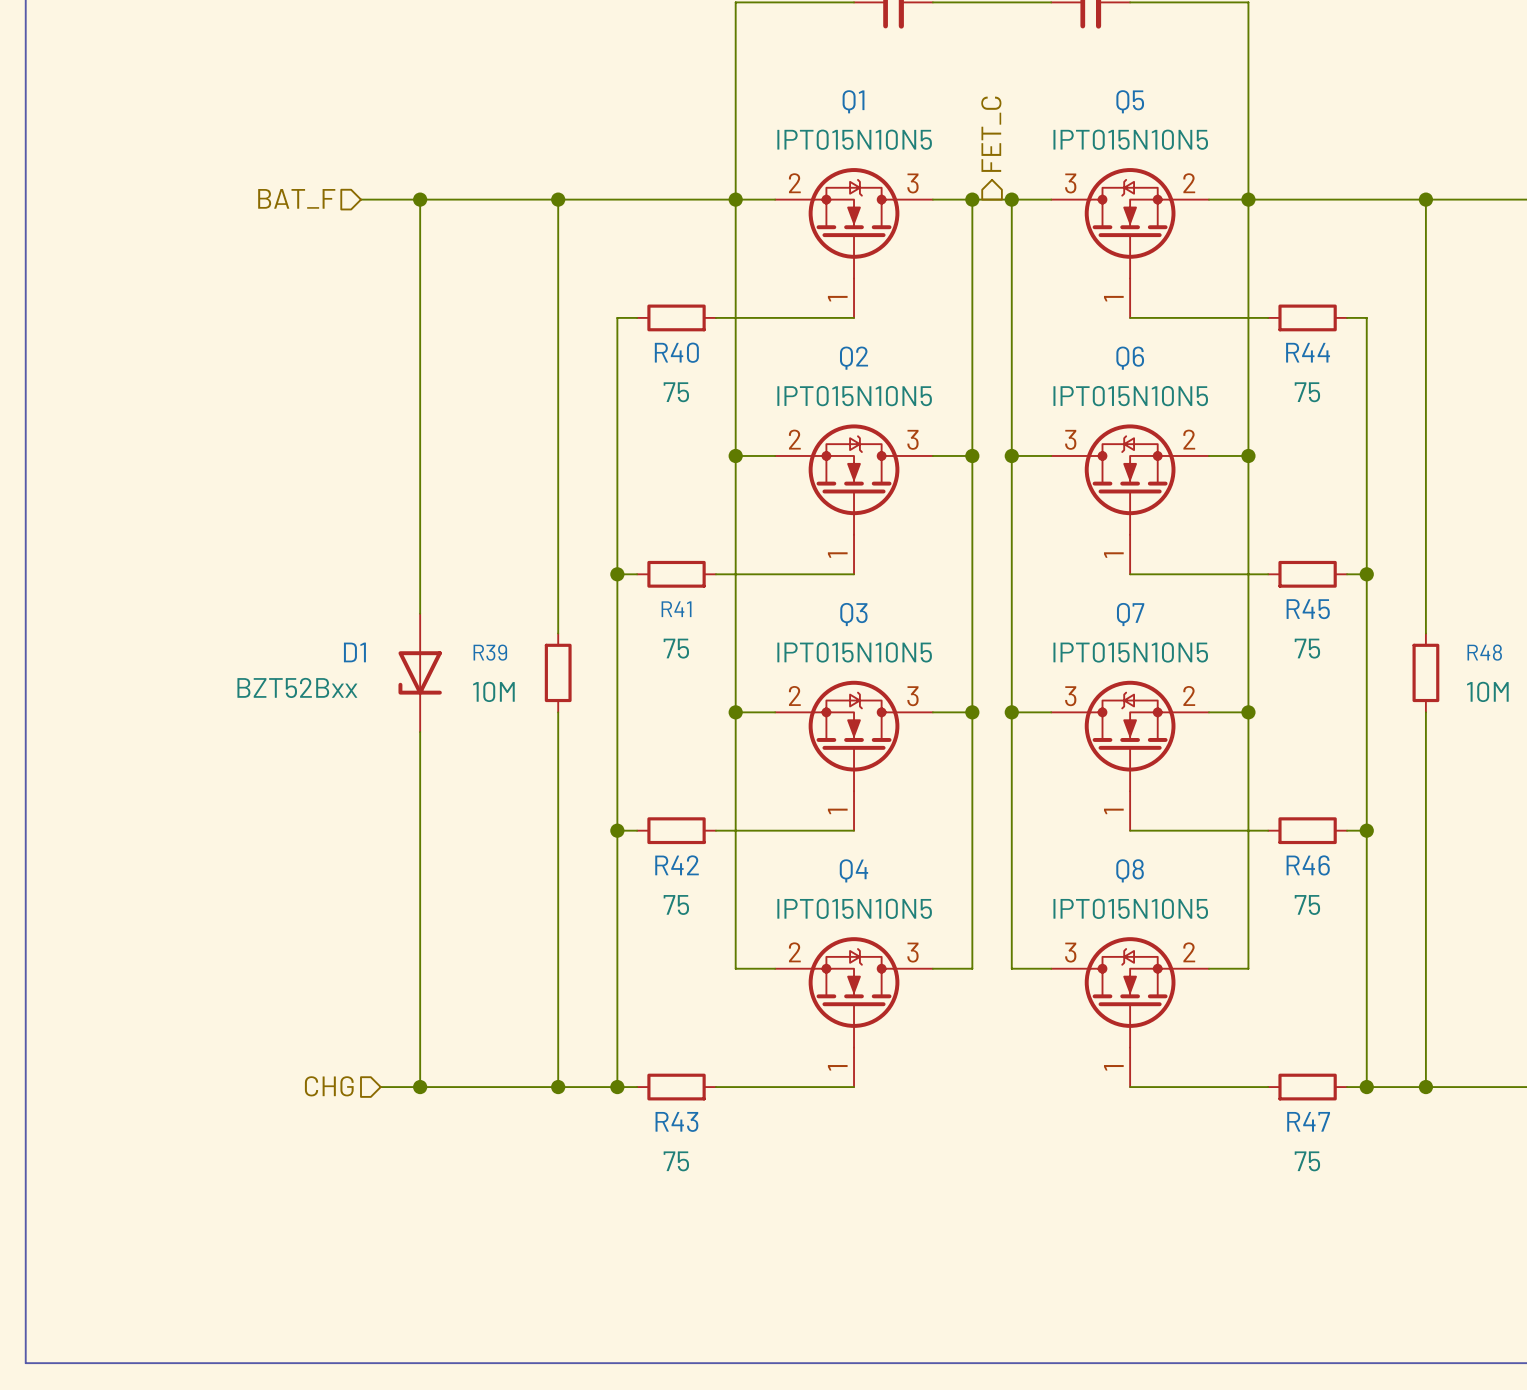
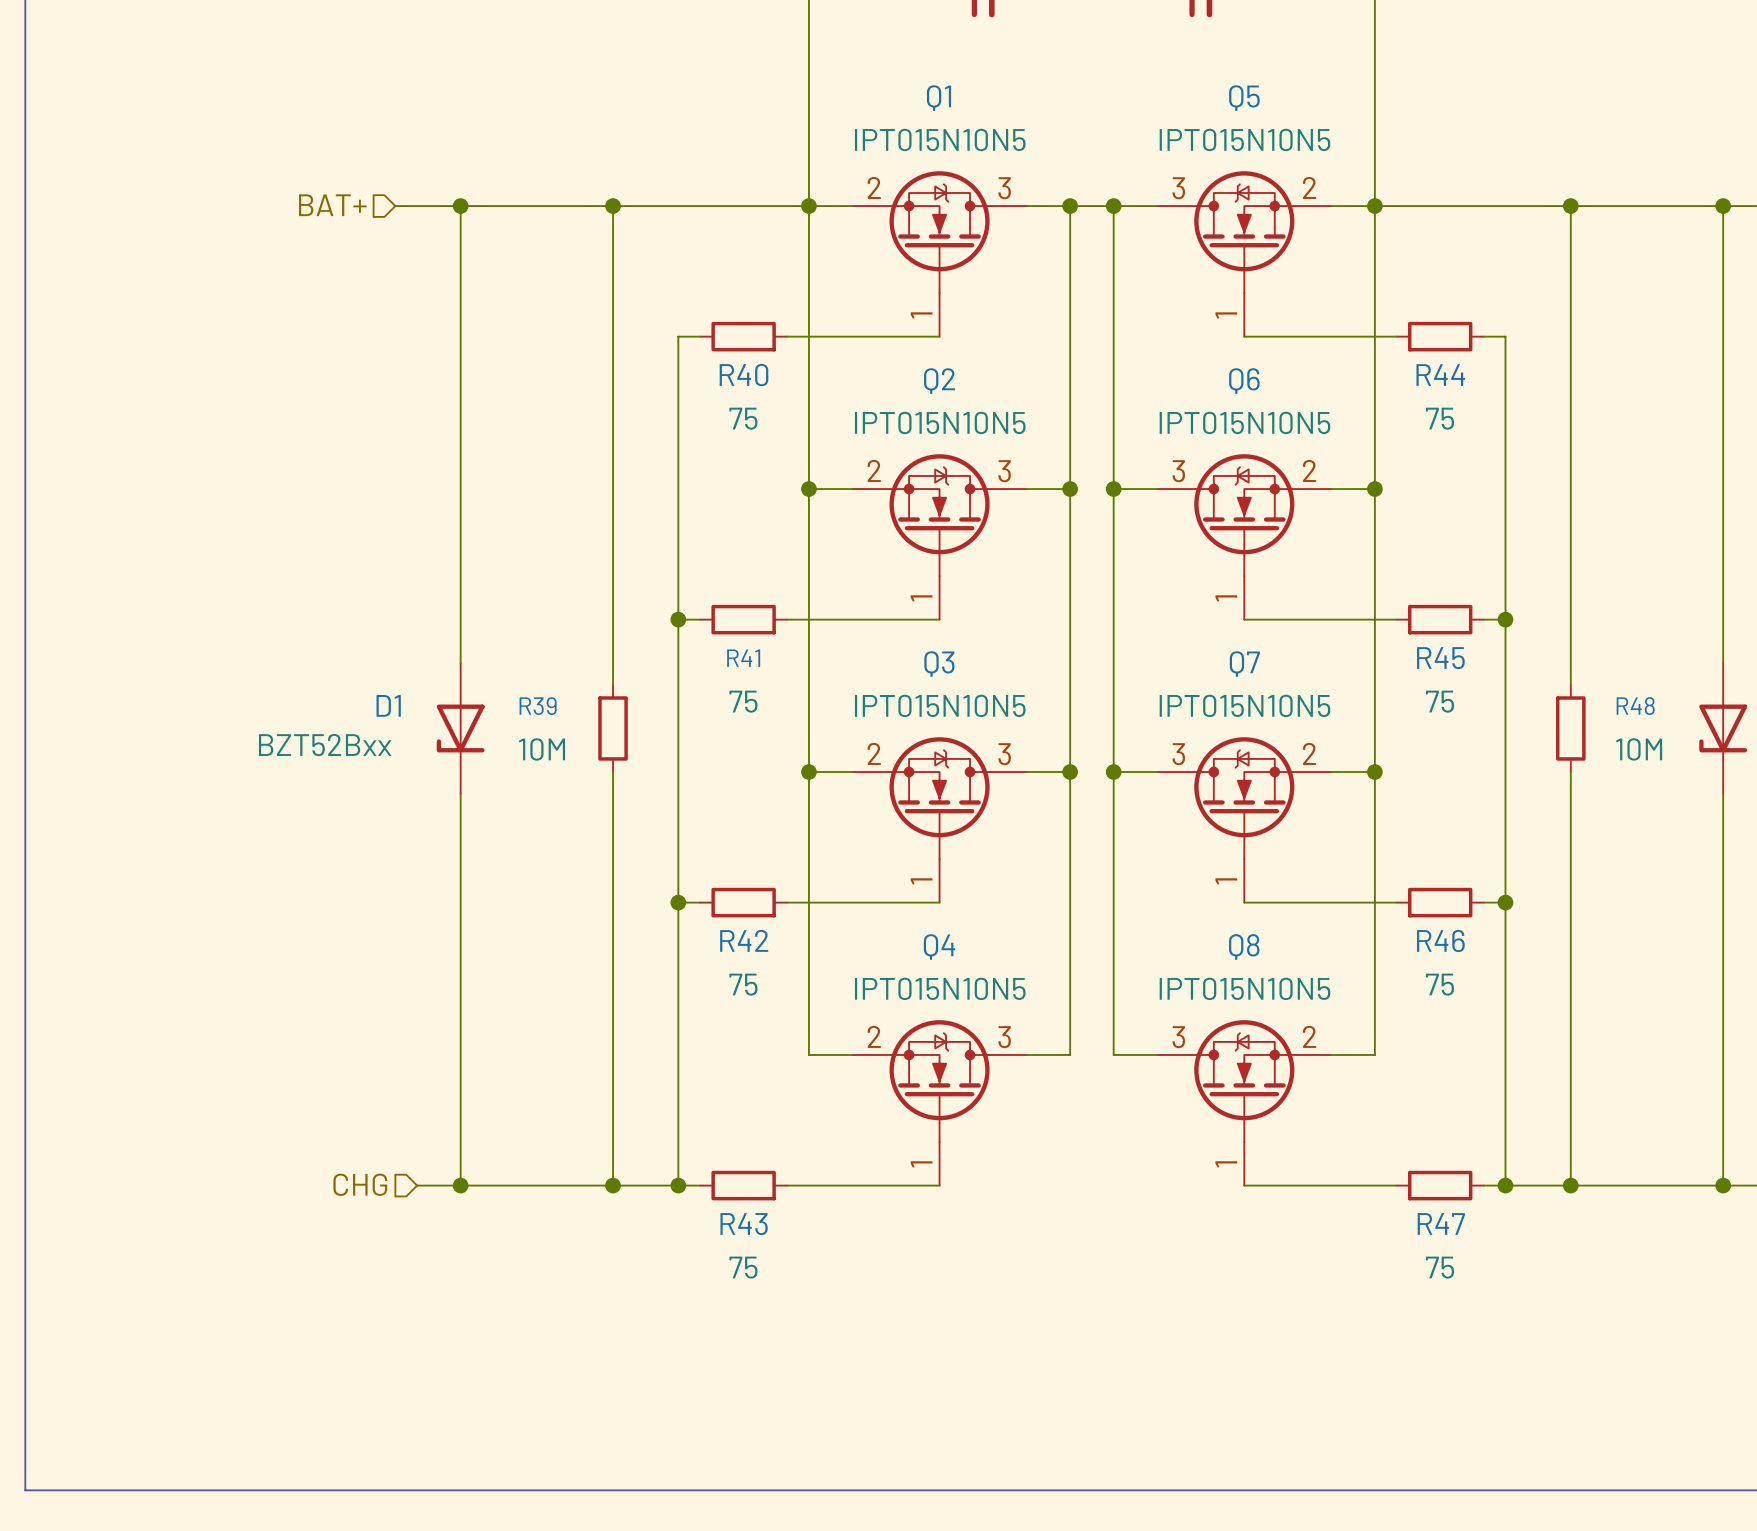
hierarchical label: FET_C (991, 134) -> none
hierarchical label: BAT_F (296, 198) -> BAT+ (332, 205)

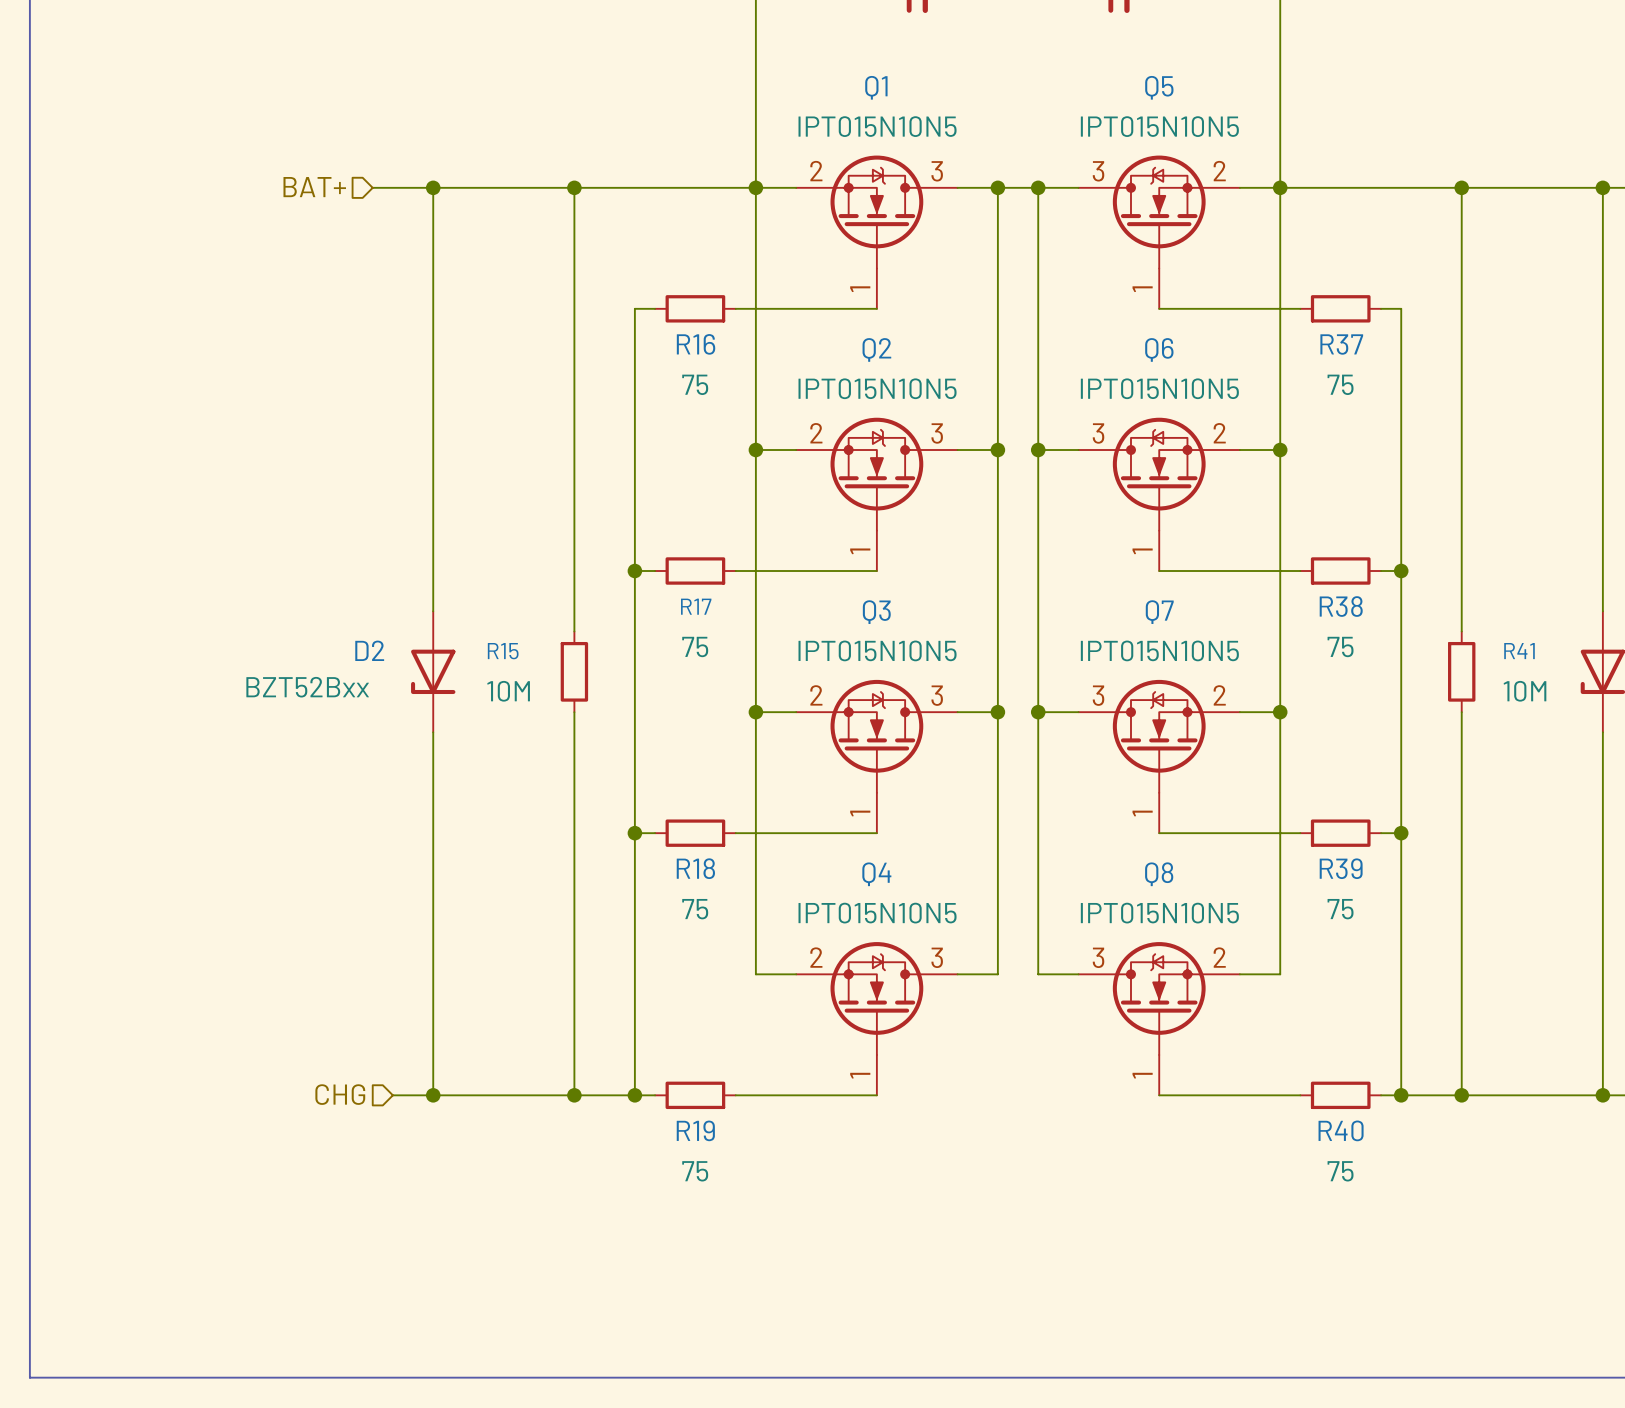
R40 name: R40 (744, 375) -> R16 (696, 344)
R44 name: R44 (1440, 375) -> R37 (1341, 344)
R41 name: R41 (743, 658) -> R17 (696, 606)
R45 name: R45 (1440, 658) -> R38 (1341, 606)
D1 name: D1 (388, 705) -> D2 (369, 650)
R39 name: R39 (538, 706) -> R15 (503, 651)
R48 name: R48 (1635, 706) -> R41 (1519, 651)
R42 name: R42 (744, 940) -> R18 (695, 868)
R46 name: R46 (1440, 940) -> R39 (1341, 868)
R47 name: R47 (1441, 1223) -> R40 (1341, 1130)
R43 name: R43 (744, 1224) -> R19 (695, 1130)

